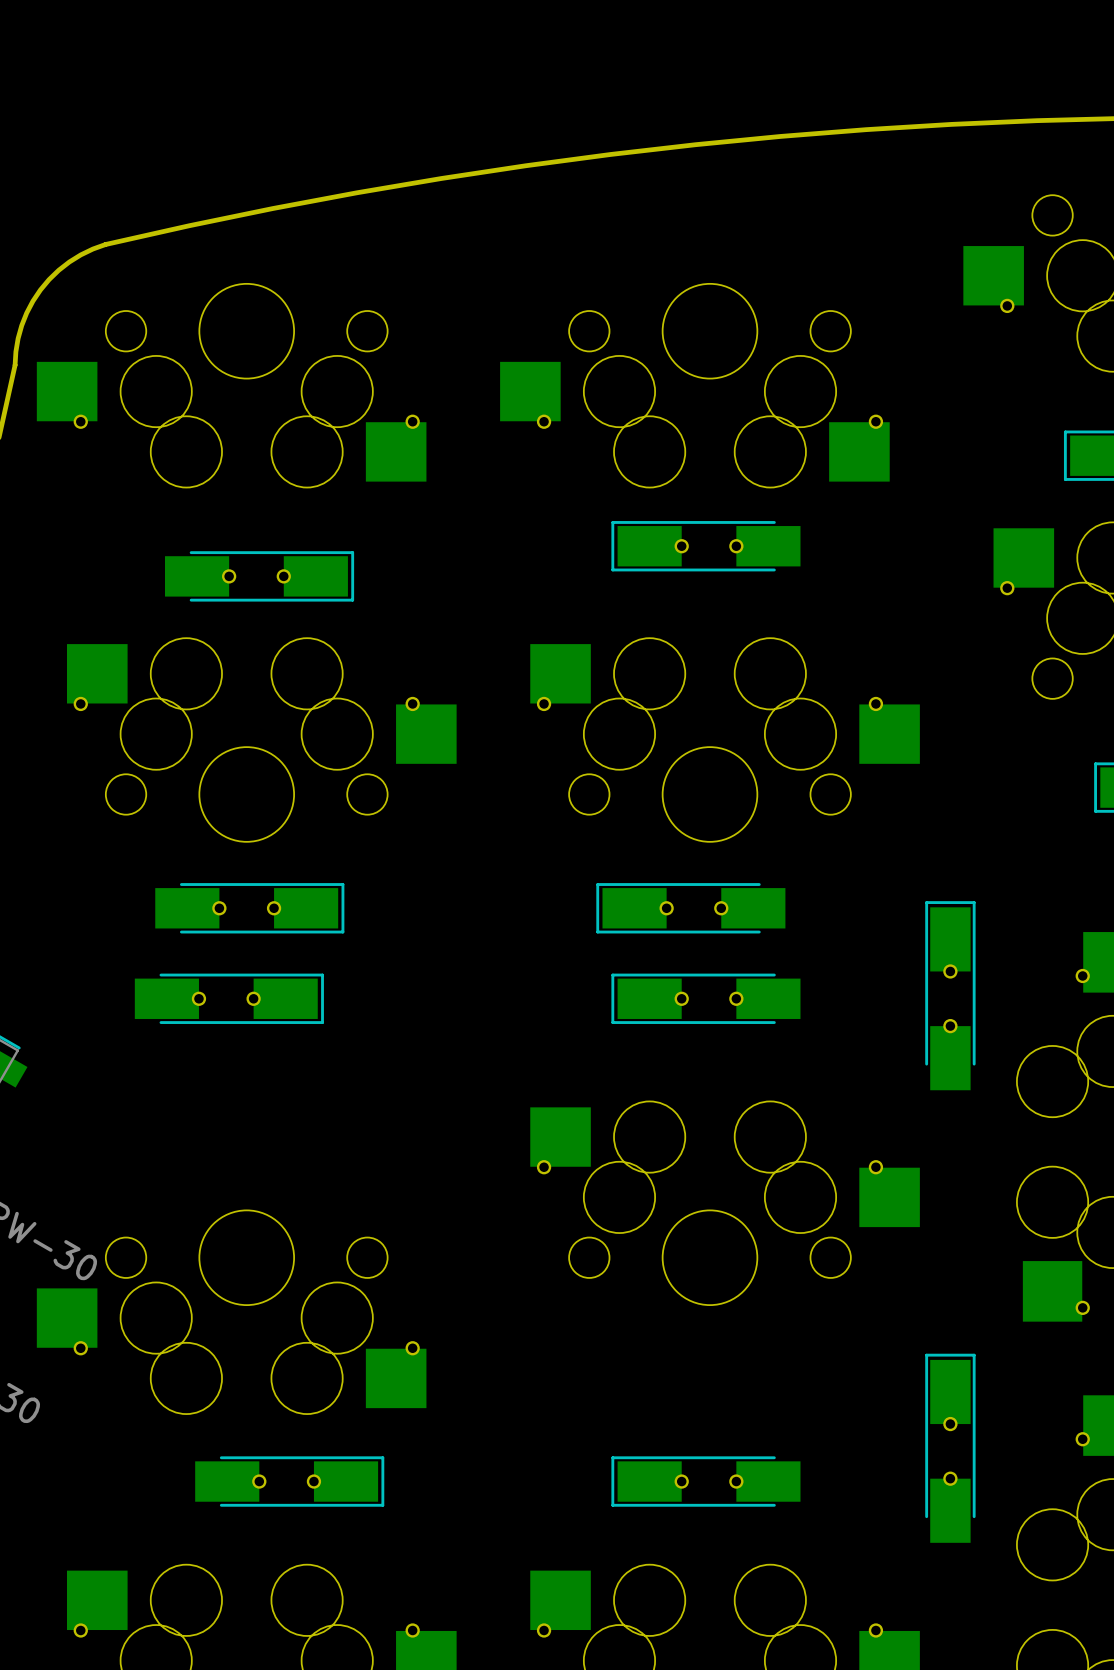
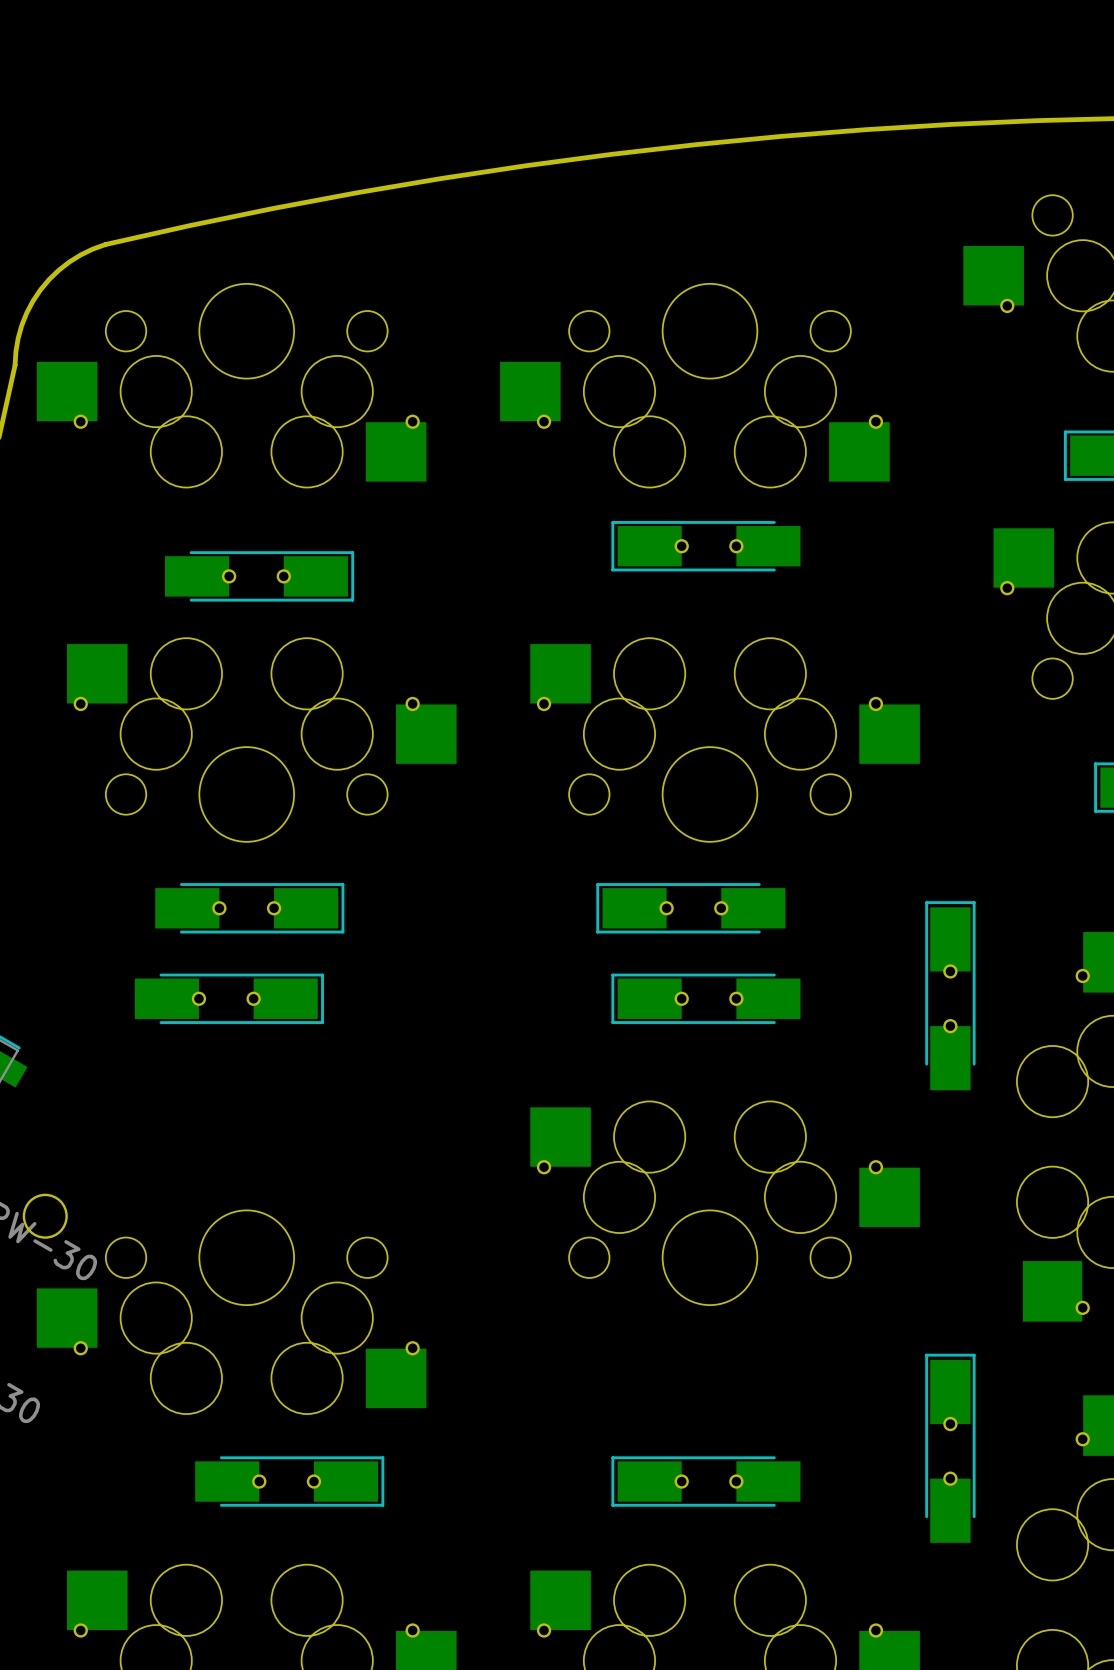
round board edge: none -> [22, 1193, 68, 1239]

